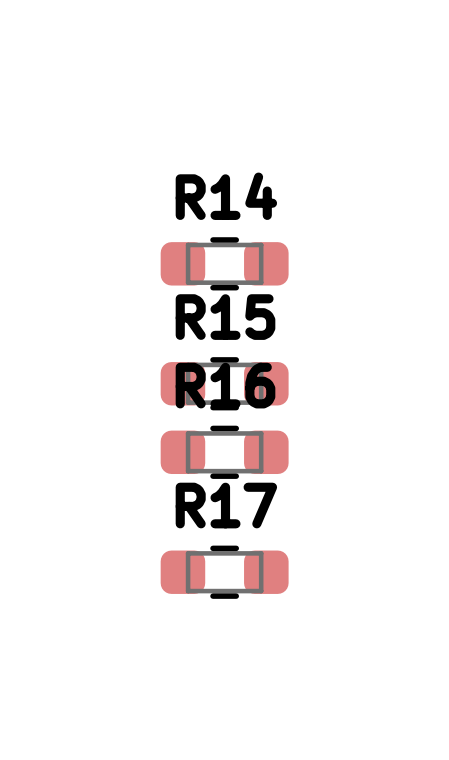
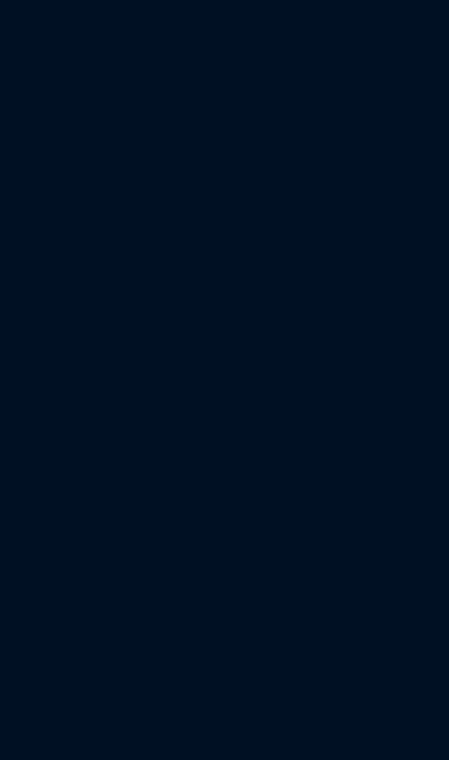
R14: (224, 263) -> none
R15: (224, 383) -> none
R16: (224, 452) -> none
R17: (224, 572) -> none

